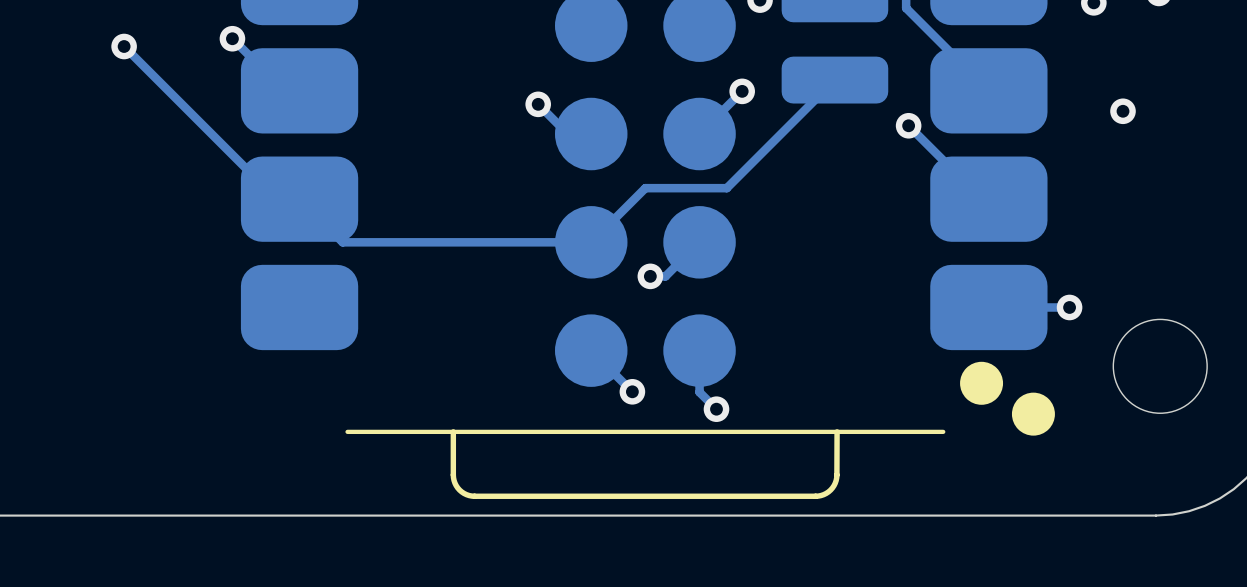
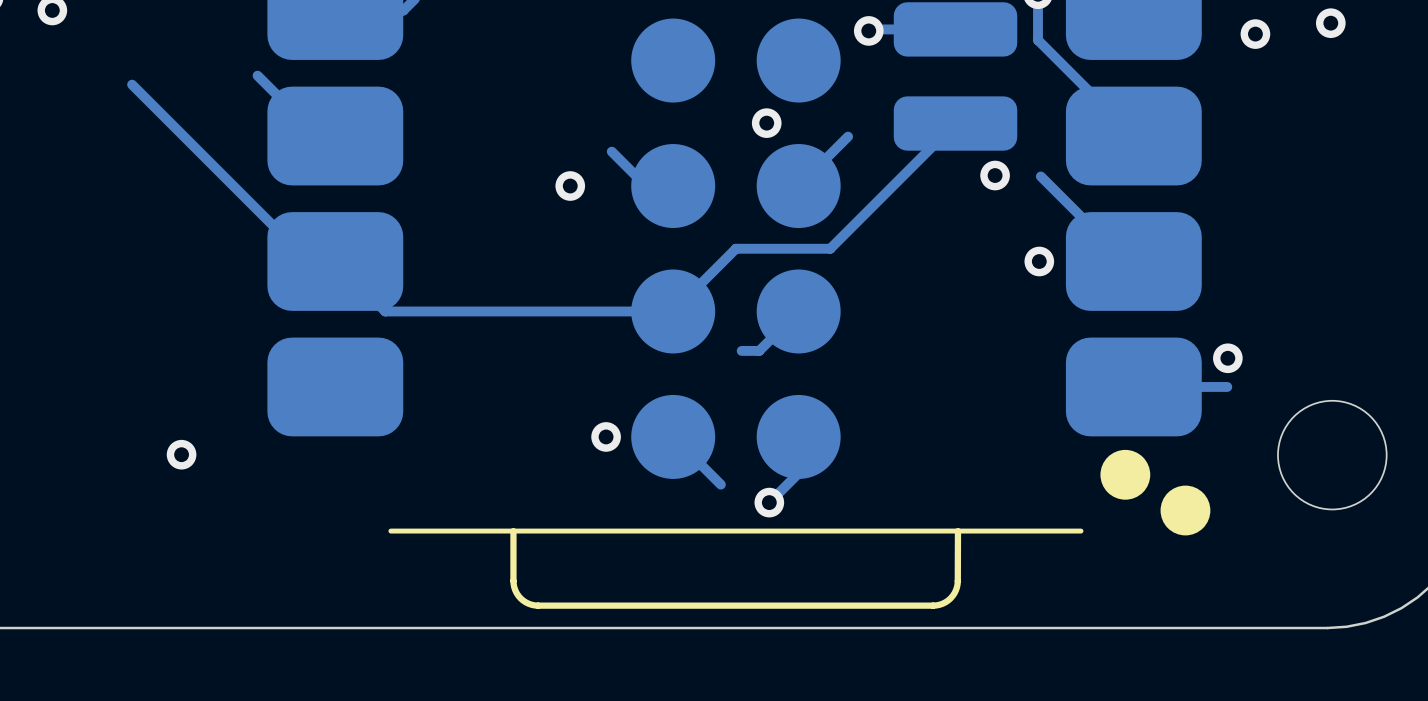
via: (232, 38) -> none
via: (124, 46) -> none
via: none -> (766, 123)
via: (742, 91) -> none
via position: (538, 104) -> (570, 186)
via: (1123, 111) -> none
via: none -> (995, 175)
via: (908, 125) -> none
via: none -> (1039, 261)
via: (650, 276) -> none
via position: (1069, 307) -> (1227, 358)
via: none -> (606, 436)
via: none -> (181, 454)
track: (699, 381) (699, 392) (716, 409) -> (798, 473) (769, 502)
via: (632, 391) -> none
via: none -> (769, 502)
via: (716, 409) -> none

